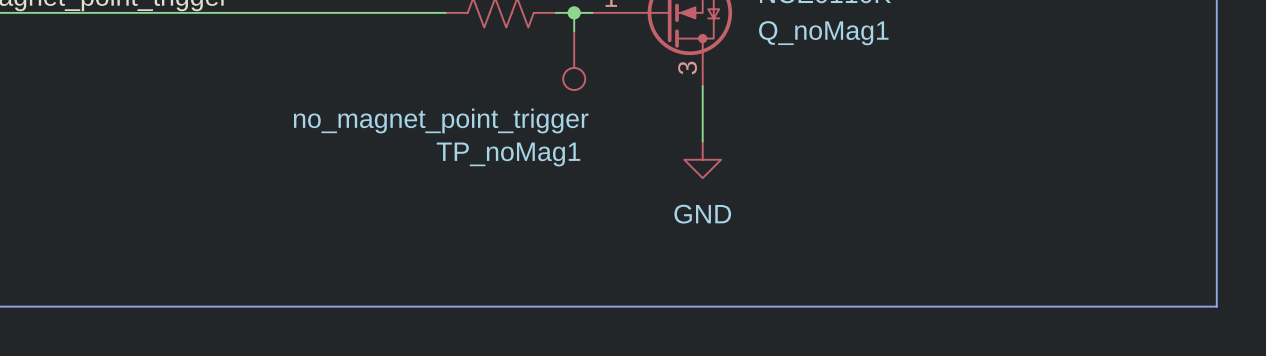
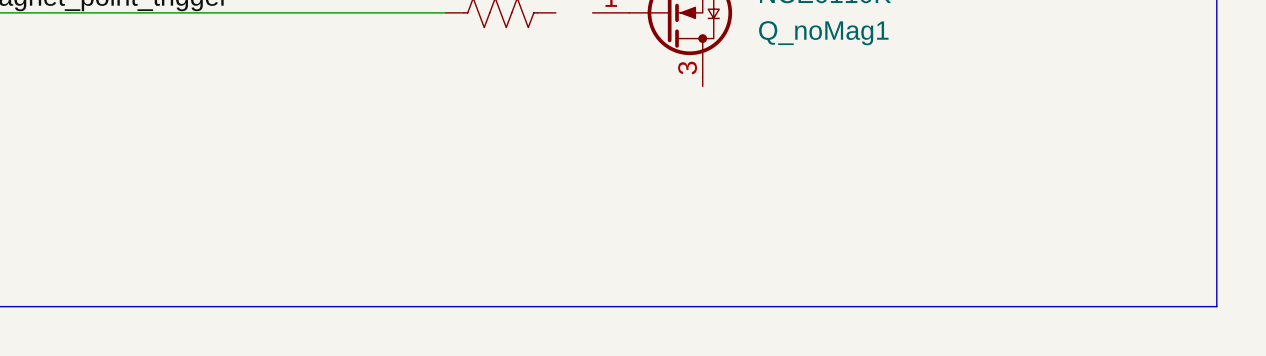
wire: (555, 12) (592, 12) -> none
wire: (574, 12) (574, 31) -> none
junction: (574, 12) -> none
TP_noMag1: no_magnet_point_trigger (574, 60) -> none
wire: (702, 86) (702, 141) -> none
power symbol: GND (702, 159) -> none

